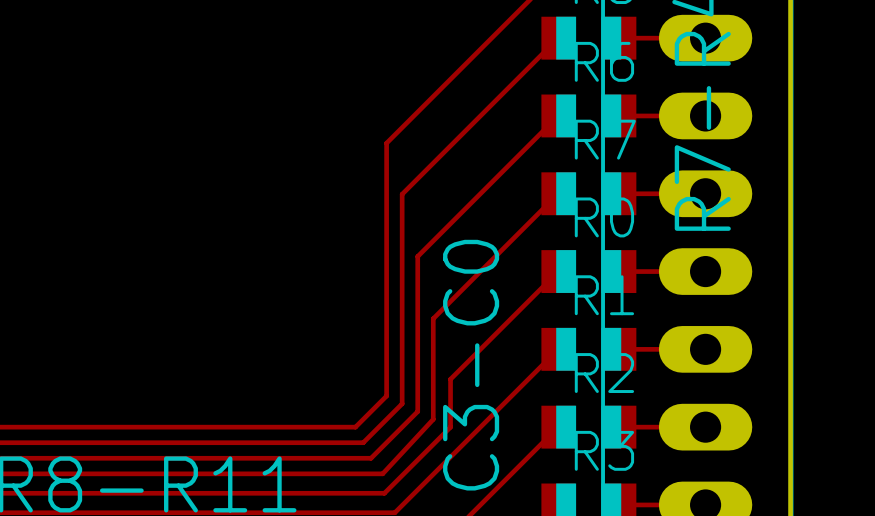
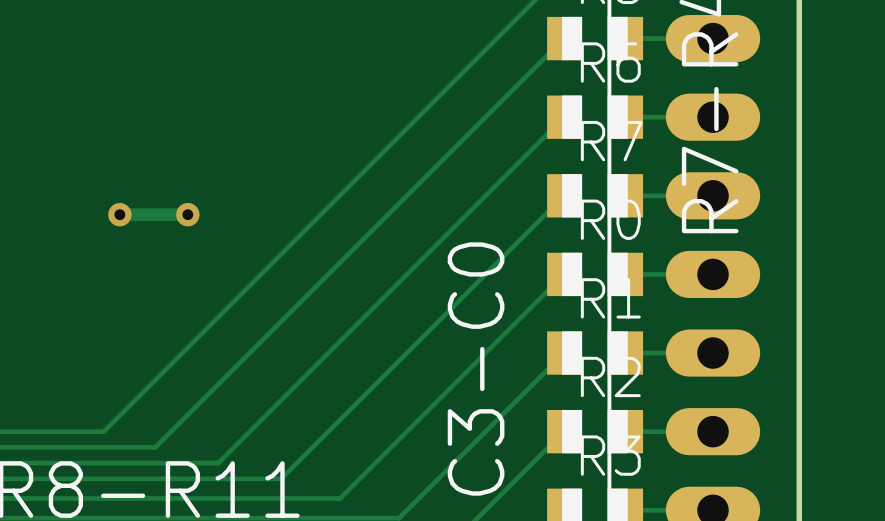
track: (386, 143) (386, 396) (355, 427) (102, 427) -> (390, 144) (103, 431)
track: (402, 194) (402, 403) (363, 442) (153, 442) -> (406, 196) (155, 447)
track: none -> (119, 214) (187, 214)
via: none -> (119, 214)
via: none -> (187, 214)
track: (417, 256) (417, 411) (371, 458) (215, 458) -> (422, 259) (218, 463)
track: (433, 318) (433, 419) (382, 473) (278, 473) -> (437, 322) (281, 478)
track: (450, 379) (450, 427) (384, 493) (336, 493) -> (455, 383) (340, 498)

